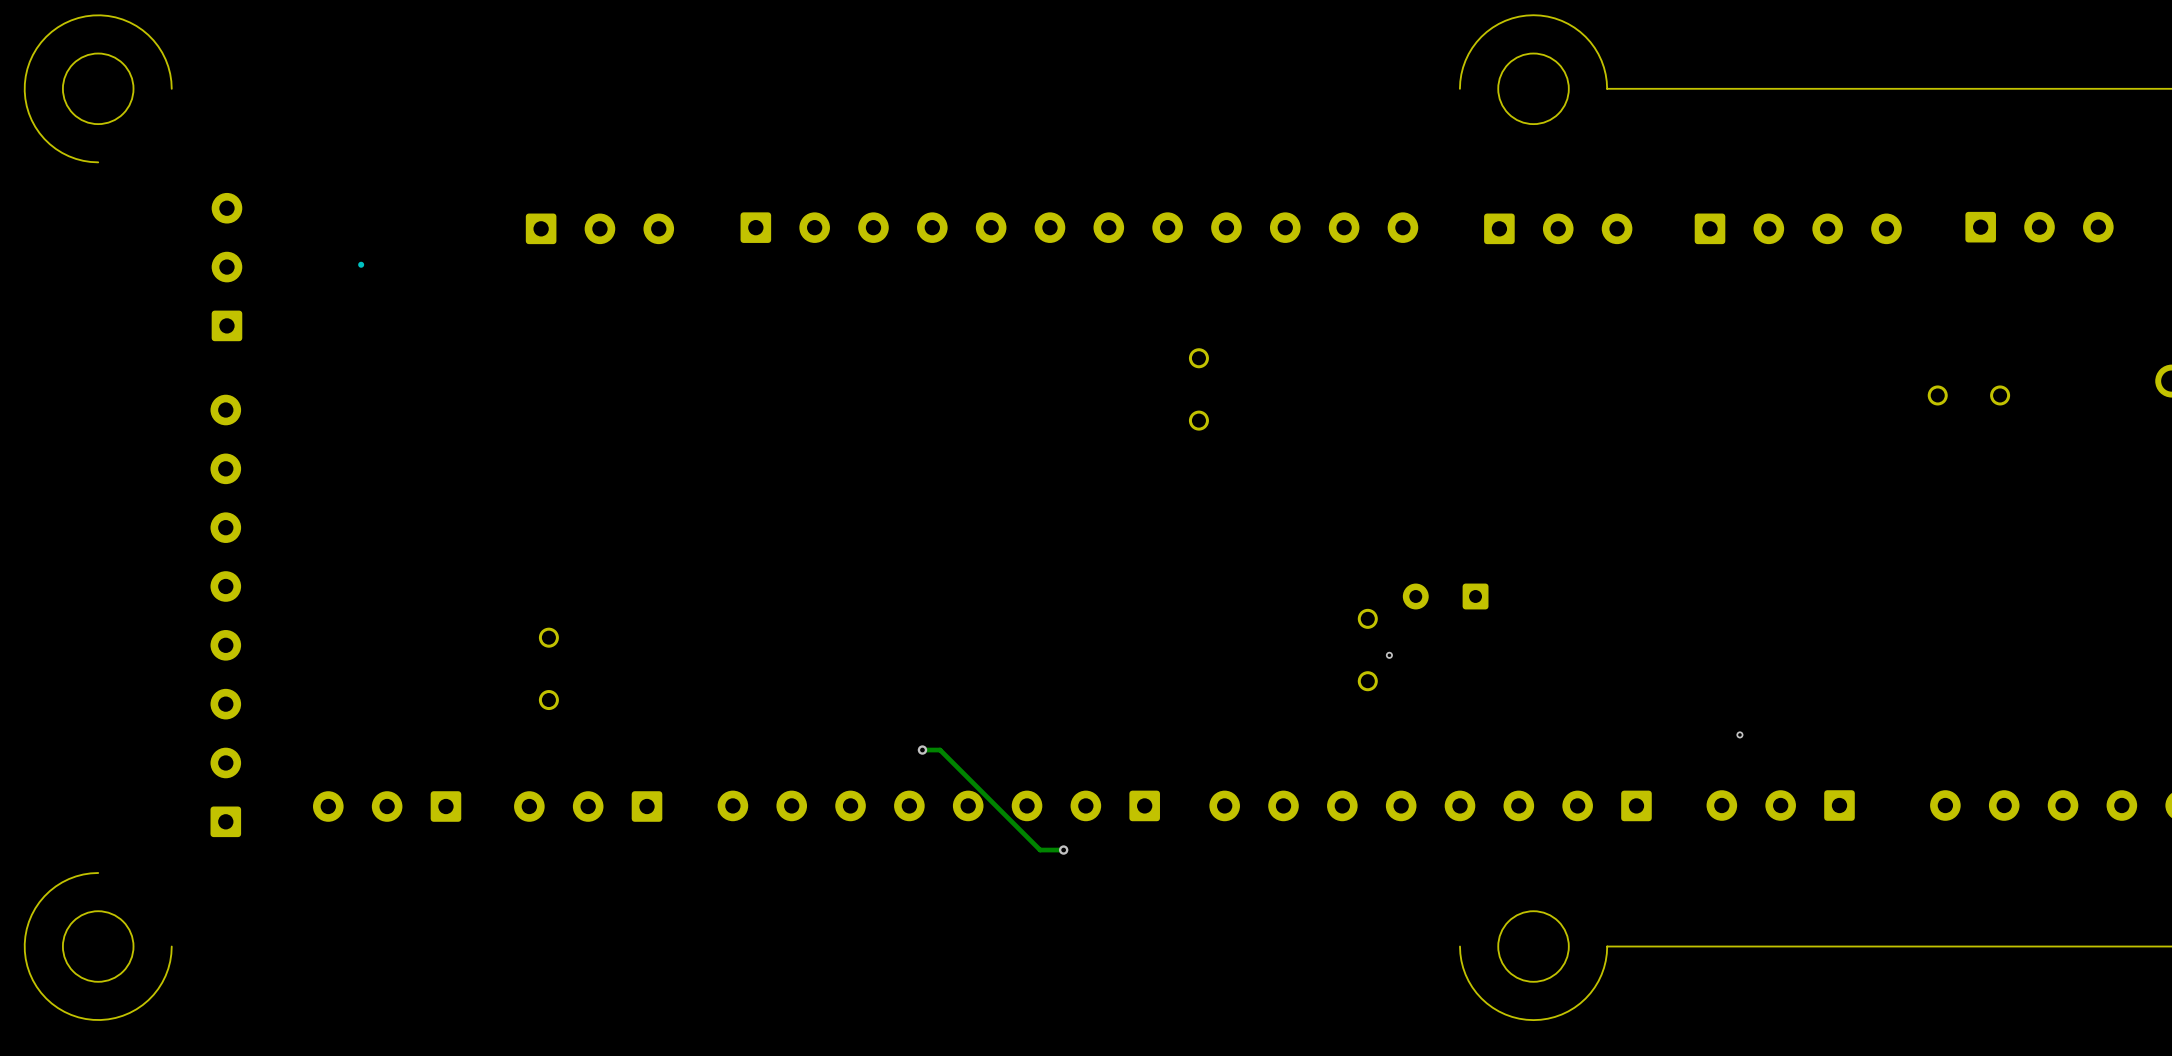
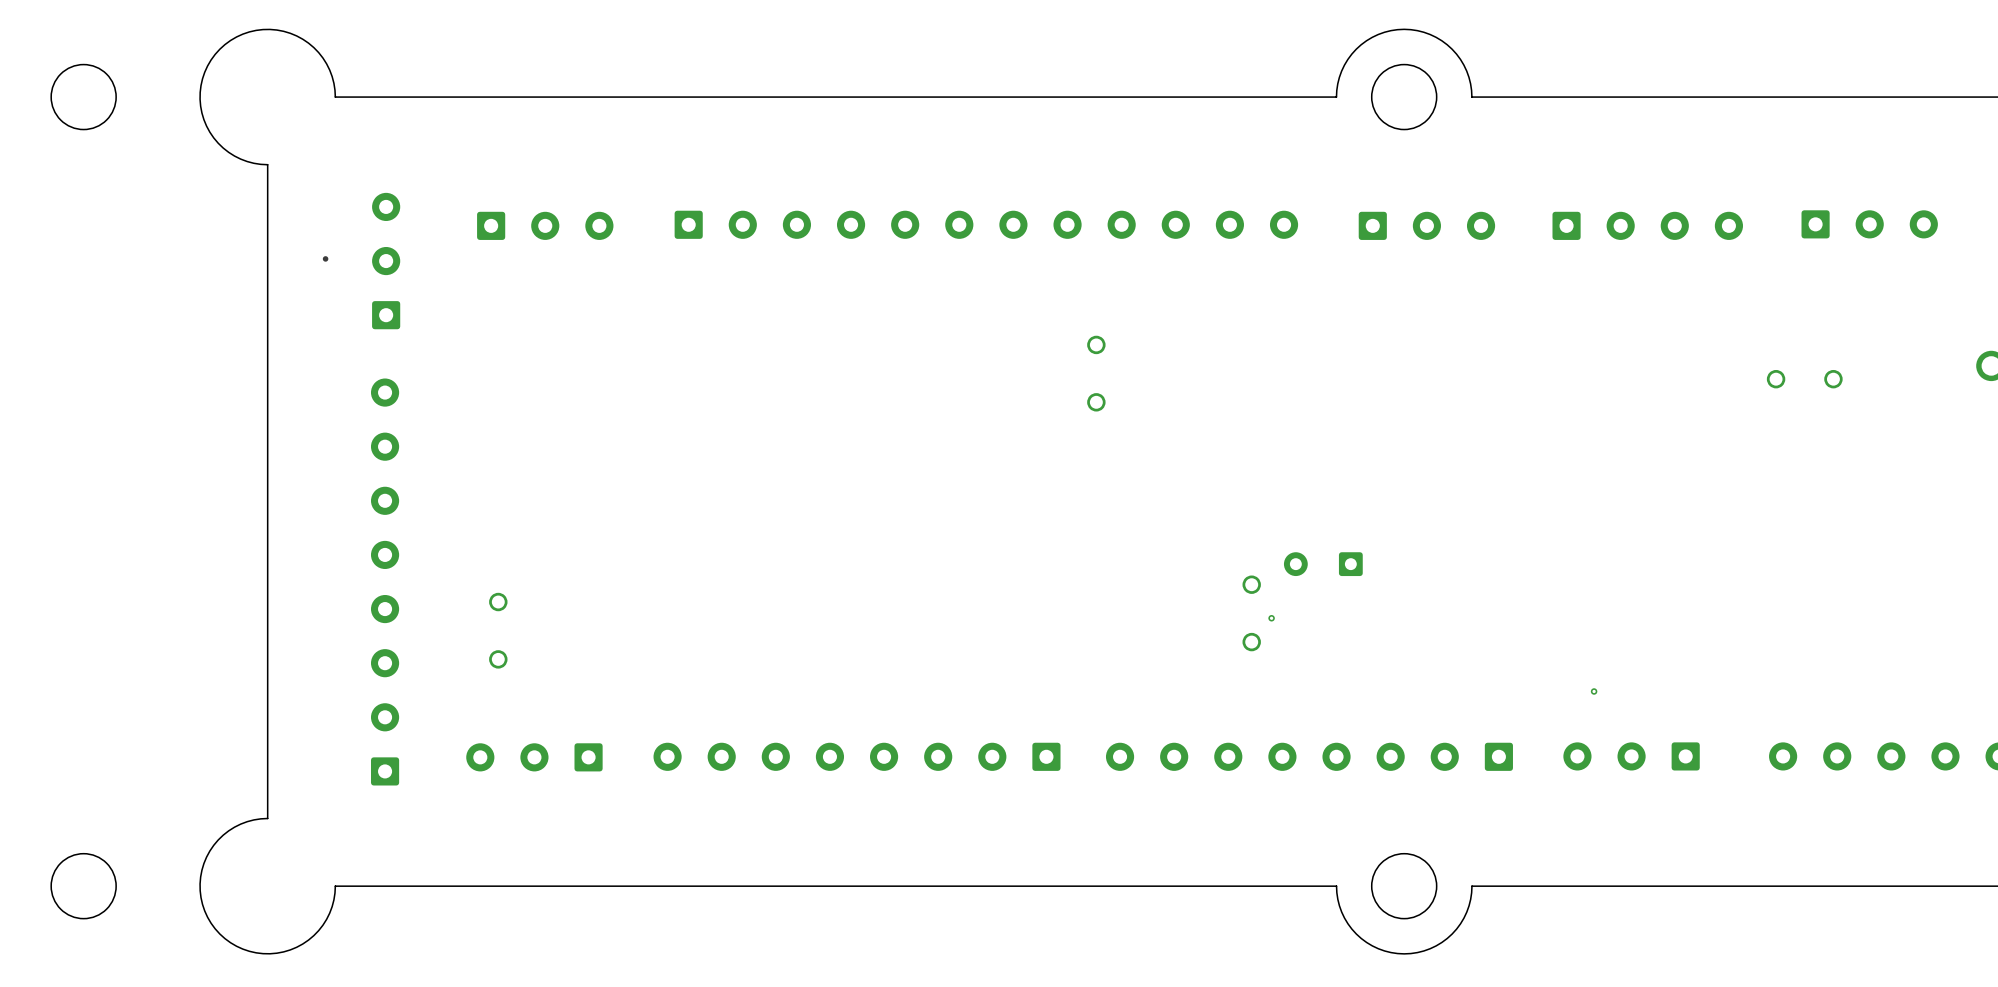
board edge: (171, 88) (168, 66) (158, 46) (142, 30) (122, 19) (100, 15) (85, 16) (64, 23) (46, 36) (32, 54) (25, 76) (25, 98) (31, 120) (44, 139) (55, 148) (75, 158) (98, 162) -> none
part position: (226, 267) -> (386, 261)
part position: (225, 615) -> (385, 582)
track: (922, 750) (940, 750) (1040, 850) (1063, 850) -> none
via: (922, 750) -> none
part: (387, 806) -> none
via: (1063, 850) -> none
board edge: (98, 872) (75, 876) (55, 886) (44, 896) (31, 914) (25, 936) (25, 959) (32, 980) (46, 998) (64, 1011) (85, 1018) (100, 1020) (122, 1015) (142, 1005) (158, 988) (168, 968) (171, 946) -> none
board edge: (1607, 946) (1601, 974) (1585, 998) (1561, 1014) (1533, 1020) (1505, 1014) (1481, 998) (1465, 974) (1459, 946) -> (1471, 886) (1466, 912) (1452, 934) (1430, 948) (1404, 953) (1378, 948) (1356, 934) (1341, 912) (1336, 886) (335, 886) (329, 913) (313, 935) (296, 947) (269, 953) (242, 949) (224, 938) (207, 917) (201, 897) (201, 870) (206, 857) (218, 839) (240, 824) (267, 818) (267, 164) (240, 159) (218, 143) (203, 119) (200, 99) (202, 78) (207, 65) (215, 54) (230, 40) (249, 31) (263, 29) (283, 31) (302, 39) (318, 52) (326, 63) (332, 76) (335, 97) (1336, 97)

